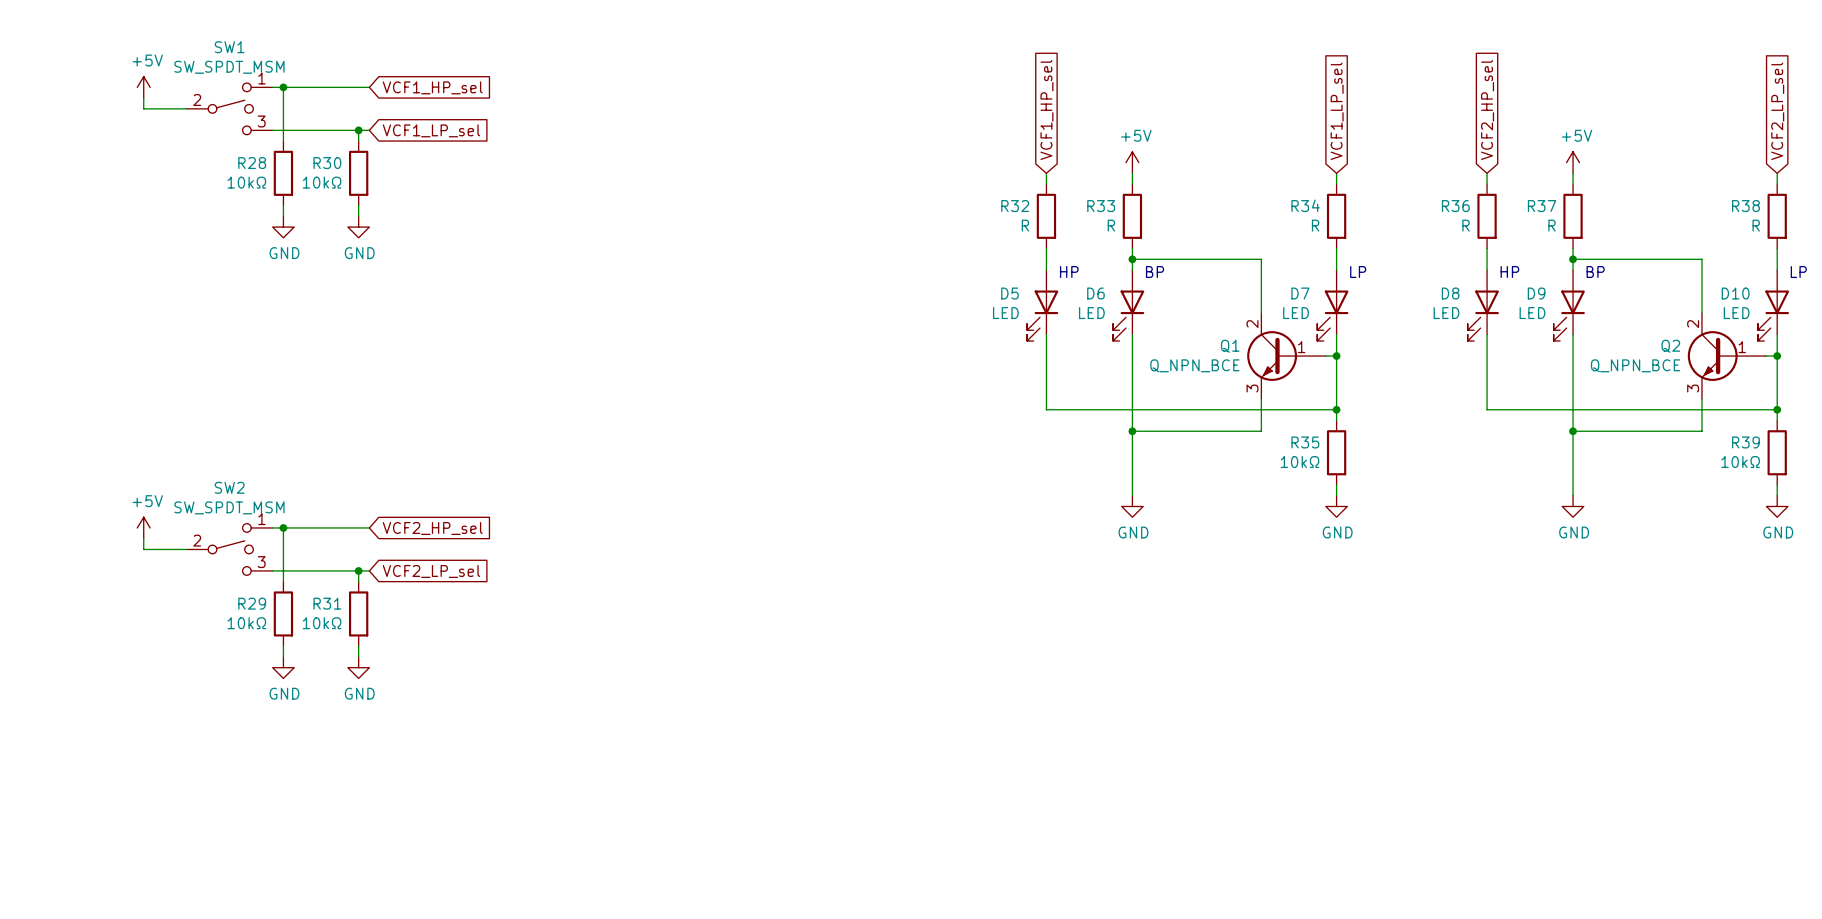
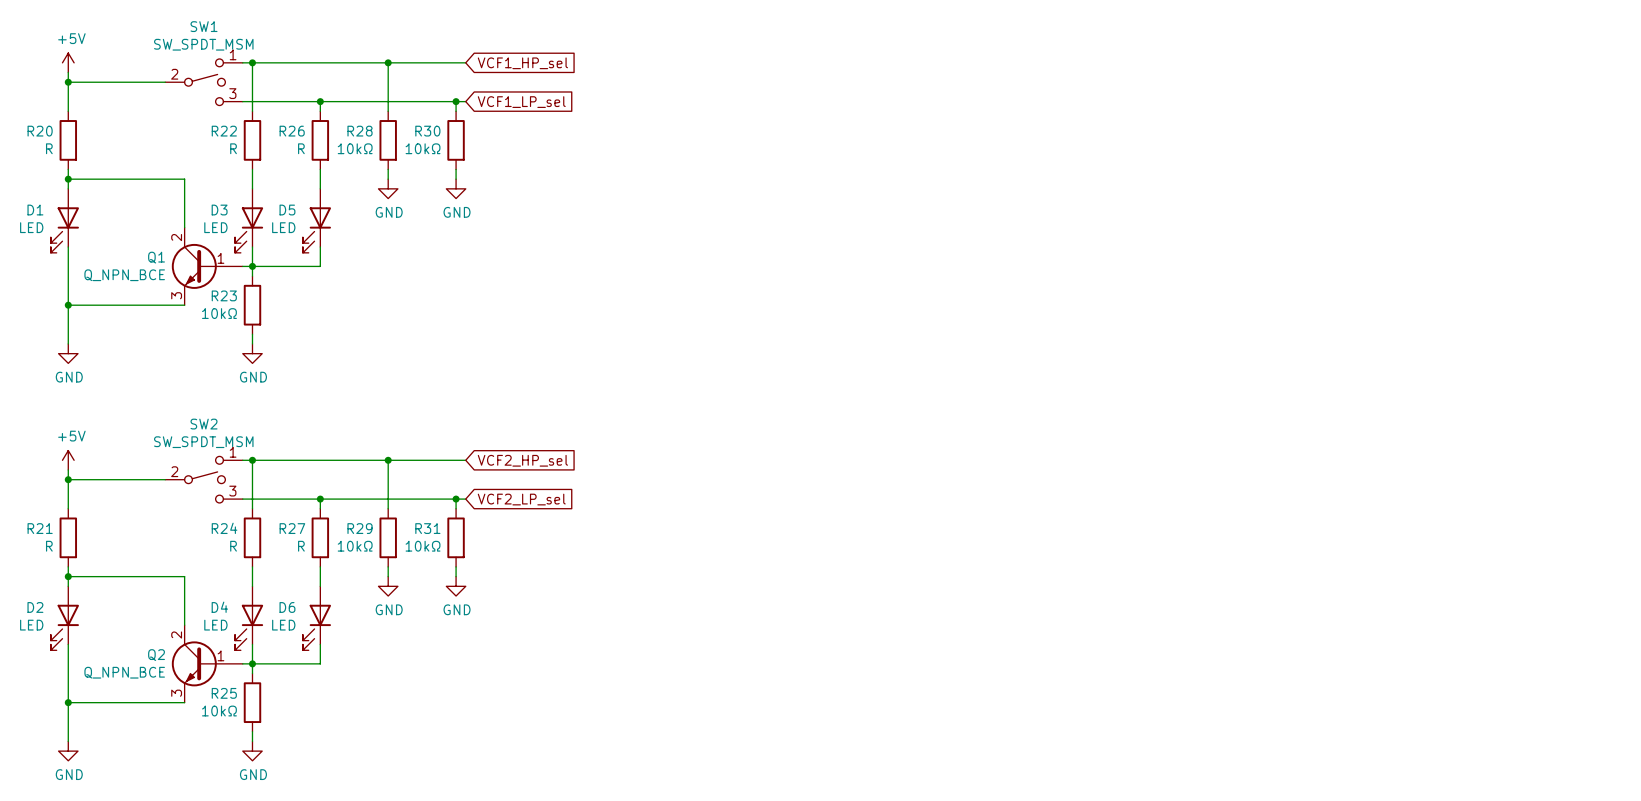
power symbol position: +5V (143, 87) -> +5V (68, 62)
wire: none -> (330, 62) (465, 62)
global label position: VCF1_HP_sel (432, 87) -> VCF1_HP_sel (522, 63)
wire: none -> (388, 62) (388, 111)
junction: none -> (388, 62)
wire: none -> (68, 72) (68, 111)
wire: (143, 98) (143, 108) -> (68, 82) (126, 82)
junction: none -> (68, 82)
global label: VCF1_HP_sel (1046, 109) -> none
global label: VCF2_HP_sel (1487, 109) -> none
global label: VCF1_LP_sel (1337, 111) -> none
global label: VCF2_LP_sel (1777, 111) -> none
wire: none -> (330, 101) (465, 101)
global label position: VCF1_LP_sel (431, 130) -> VCF1_LP_sel (521, 102)
wire: none -> (456, 101) (456, 111)
junction: none -> (456, 101)
power symbol: +5V (1132, 162) -> none
power symbol: +5V (1573, 162) -> none
R28 name: R28 (252, 163) -> R22 (224, 131)
R30 name: R30 (327, 163) -> R26 (292, 131)
R20: none -> R (68, 140)
R28: none -> 10kΩ (388, 140)
R30: none -> 10kΩ (456, 140)
wire: (1046, 173) (1046, 184) -> none
wire: (1132, 173) (1132, 184) -> none
wire: (1336, 173) (1336, 184) -> none
wire: (1487, 173) (1487, 184) -> none
wire: (1573, 173) (1573, 184) -> none
wire: (1777, 173) (1777, 184) -> none
R28 value: 10kΩ (246, 182) -> R (233, 148)
R30 value: 10kΩ (322, 182) -> R (301, 148)
wire: none -> (68, 169) (68, 188)
wire: none -> (388, 169) (388, 179)
wire: none -> (456, 169) (456, 179)
wire: none -> (68, 179) (184, 179) (184, 227)
junction: none -> (68, 179)
R32: R (1046, 216) -> none
R33: R (1132, 216) -> none
R34: R (1336, 216) -> none
R36: R (1487, 216) -> none
R37: R (1573, 216) -> none
R38: R (1777, 216) -> none
power symbol: GND (283, 227) -> none
power symbol: GND (358, 227) -> none
power symbol: none -> GND (388, 188)
power symbol: none -> GND (456, 188)
wire: (1046, 248) (1046, 270) -> none
wire: (1132, 248) (1132, 270) -> none
wire: (1336, 248) (1336, 270) -> none
wire: (1487, 248) (1487, 270) -> none
wire: (1573, 248) (1573, 270) -> none
wire: (1777, 248) (1777, 270) -> none
wire: (1132, 259) (1261, 259) (1261, 313) -> none
junction: (1132, 259) -> none
wire: (1573, 259) (1701, 259) (1701, 313) -> none
junction: (1573, 259) -> none
D1: none -> LED (64, 220)
D3: none -> LED (249, 220)
text: HP (1069, 272) -> none
text: BP (1155, 272) -> none
text: LP (1358, 272) -> none
text: HP (1509, 272) -> none
text: BP (1595, 272) -> none
text: LP (1798, 272) -> none
wire: none -> (68, 247) (68, 343)
wire: none -> (252, 247) (252, 276)
wire: none -> (320, 247) (320, 266) (242, 266)
D5 position: (1042, 305) -> (316, 220)
D6 position: (1128, 305) -> (316, 618)
D7: LED (1332, 305) -> none
D8: LED (1483, 305) -> none
D9: LED (1569, 305) -> none
D10: LED (1773, 305) -> none
junction: none -> (252, 266)
wire: (1046, 334) (1046, 409) (1336, 409) -> none
wire: (1132, 334) (1132, 495) -> none
wire: (1336, 334) (1336, 420) -> none
wire: (1487, 334) (1487, 409) (1777, 409) -> none
wire: (1573, 334) (1573, 495) -> none
wire: (1777, 334) (1777, 420) -> none
wire: none -> (68, 305) (184, 305)
junction: none -> (68, 305)
R23: none -> 10kΩ (252, 305)
Q1 position: (1286, 356) -> (207, 266)
wire: (1325, 356) (1336, 356) -> none
junction: (1336, 356) -> none
Q2 position: (1727, 356) -> (207, 663)
wire: (1766, 356) (1777, 356) -> none
junction: (1777, 356) -> none
wire: none -> (252, 334) (252, 343)
wire: (1261, 399) (1261, 431) (1132, 431) -> none
wire: (1701, 399) (1701, 431) (1573, 431) -> none
power symbol: none -> GND (68, 353)
power symbol: none -> GND (252, 353)
junction: (1336, 409) -> none
junction: (1777, 409) -> none
junction: (1132, 431) -> none
junction: (1573, 431) -> none
R35: 10kΩ (1336, 452) -> none
R39: 10kΩ (1777, 452) -> none
wire: (1336, 484) (1336, 495) -> none
wire: (1777, 484) (1777, 495) -> none
power symbol: GND (1132, 506) -> none
power symbol: GND (1336, 506) -> none
power symbol: GND (1573, 506) -> none
power symbol: GND (1777, 506) -> none
power symbol position: +5V (143, 527) -> +5V (68, 460)
wire: none -> (330, 460) (465, 460)
wire: none -> (388, 460) (388, 508)
junction: none -> (388, 460)
global label position: VCF2_HP_sel (432, 528) -> VCF2_HP_sel (522, 460)
wire: none -> (68, 469) (68, 508)
wire: (143, 538) (143, 549) -> (68, 479) (126, 479)
junction: none -> (68, 479)
wire: none -> (330, 499) (465, 499)
wire: none -> (456, 499) (456, 508)
junction: none -> (456, 499)
global label position: VCF2_LP_sel (431, 571) -> VCF2_LP_sel (521, 499)
R29 name: R29 (252, 603) -> R24 (224, 528)
R31 name: R31 (327, 603) -> R27 (292, 528)
R21: none -> R (68, 537)
R29: none -> 10kΩ (388, 537)
R31: none -> 10kΩ (456, 537)
R29 value: 10kΩ (246, 623) -> R (233, 546)
R31 value: 10kΩ (322, 623) -> R (301, 546)
wire: none -> (68, 566) (68, 586)
wire: none -> (388, 566) (388, 576)
wire: none -> (456, 566) (456, 576)
wire: none -> (68, 576) (184, 576) (184, 625)
junction: none -> (68, 576)
power symbol: GND (283, 667) -> none
power symbol: GND (358, 667) -> none
power symbol: none -> GND (388, 586)
power symbol: none -> GND (456, 586)
D2: none -> LED (64, 618)
D4: none -> LED (249, 618)
wire: none -> (68, 644) (68, 741)
wire: none -> (252, 644) (252, 673)
wire: none -> (320, 644) (320, 663) (242, 663)
junction: none -> (252, 663)
wire: none -> (68, 702) (184, 702)
junction: none -> (68, 702)
R25: none -> 10kΩ (252, 702)
wire: none -> (252, 731) (252, 741)
power symbol: none -> GND (68, 751)
power symbol: none -> GND (252, 751)

